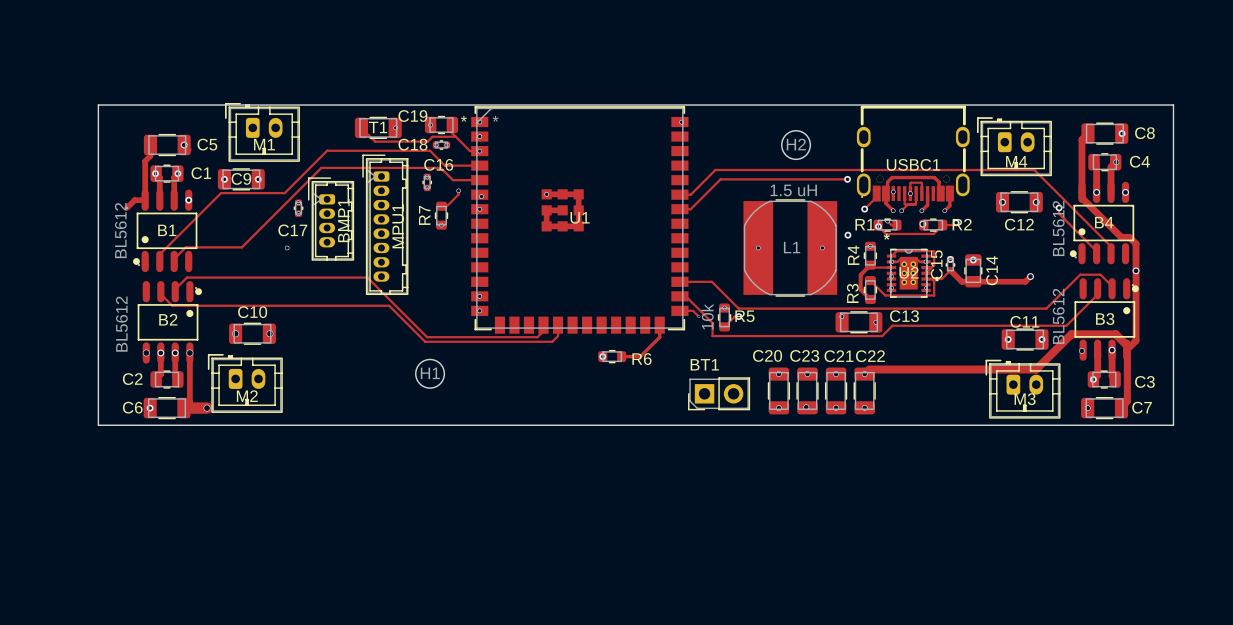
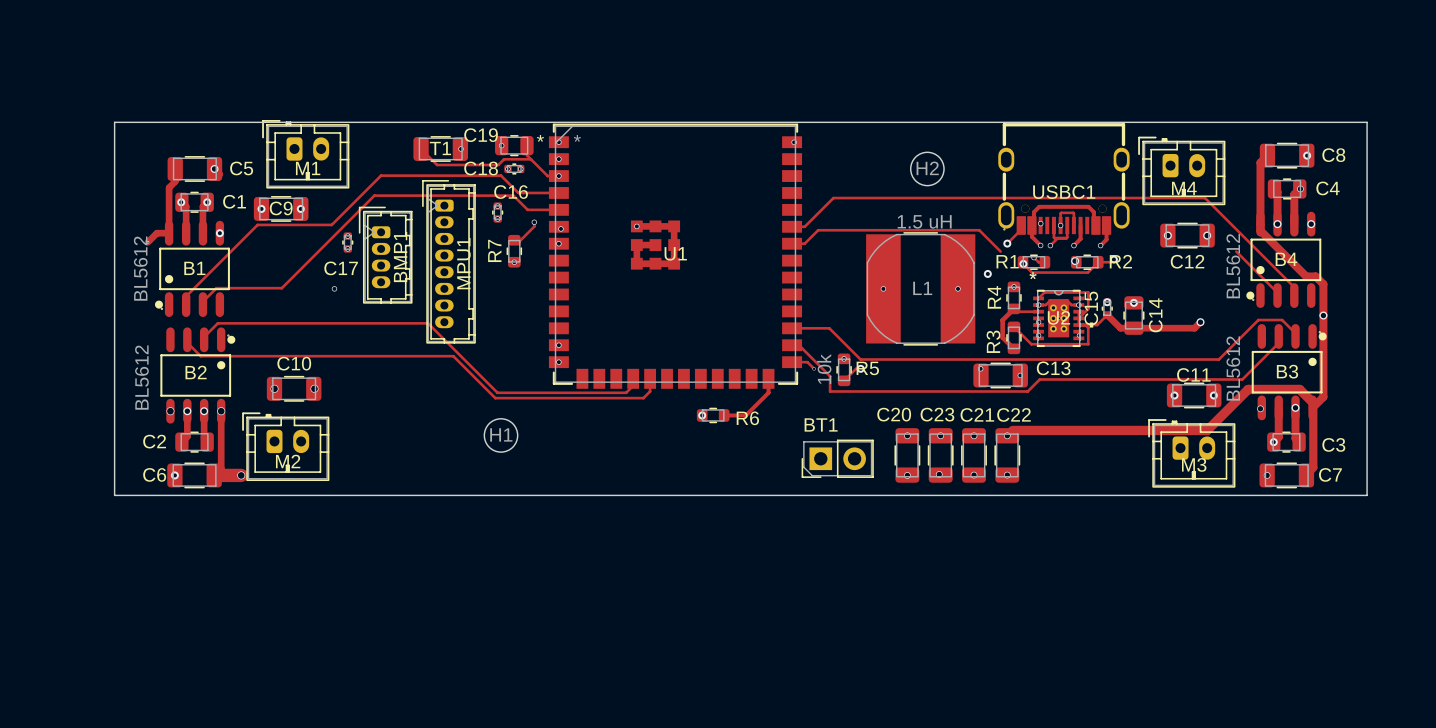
track: (847, 179) (720, 179) (702, 197) -> (1000, 251) (979, 230) (818, 230)
via: (847, 179) -> none
track: (1059, 207) (1059, 213) (1061, 215) -> none
via: (1059, 207) -> none

